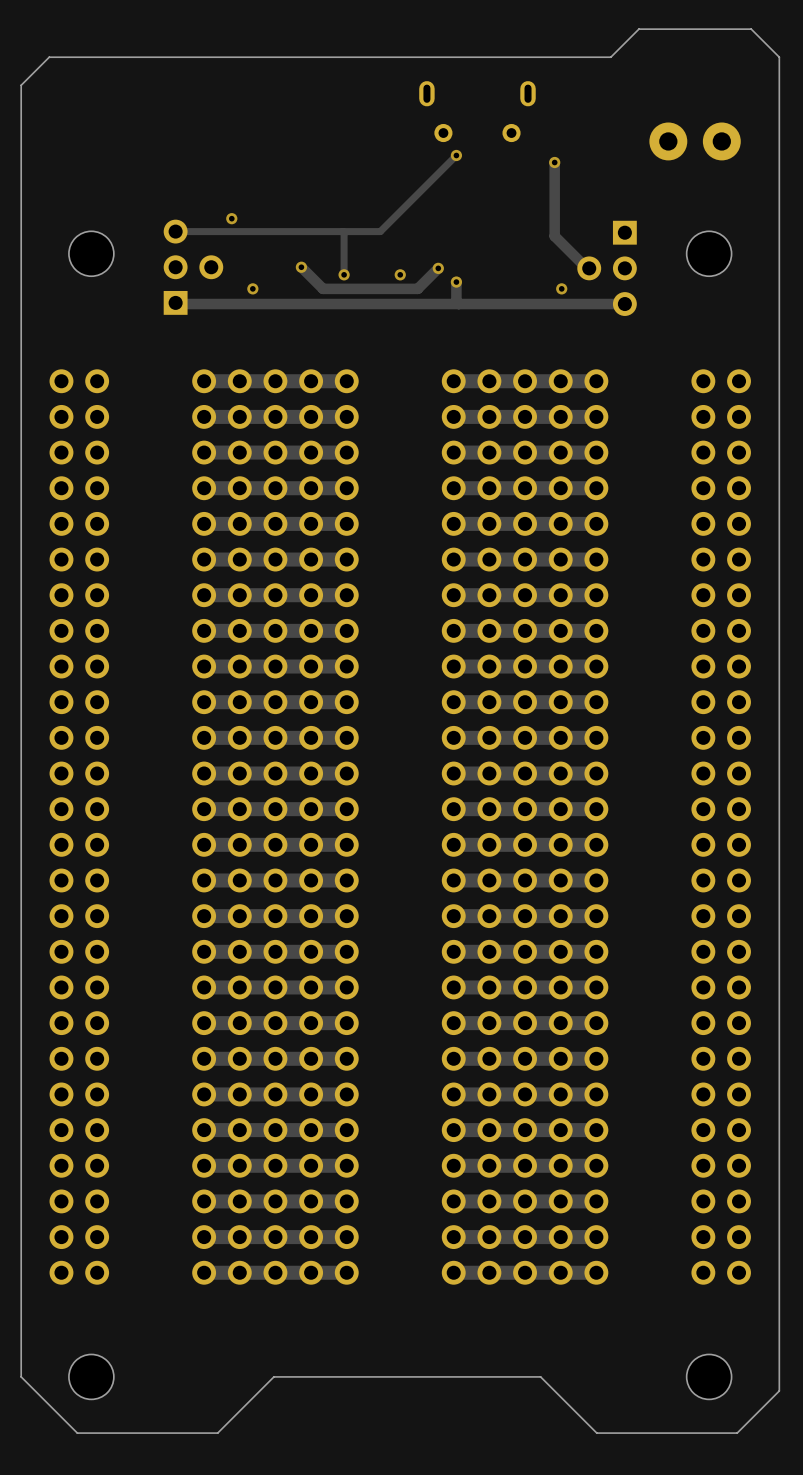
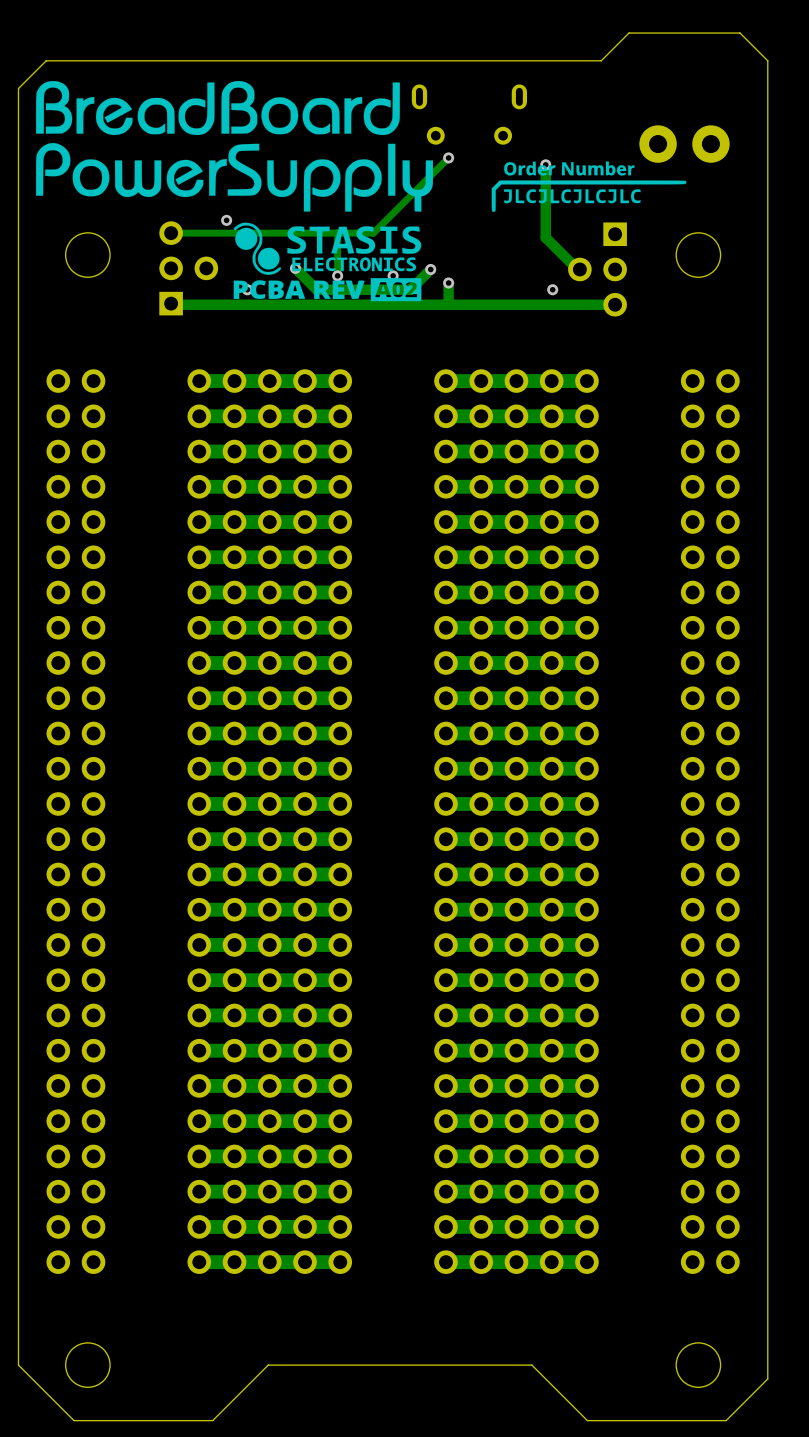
drawing: none -> [36, 80, 687, 302]

